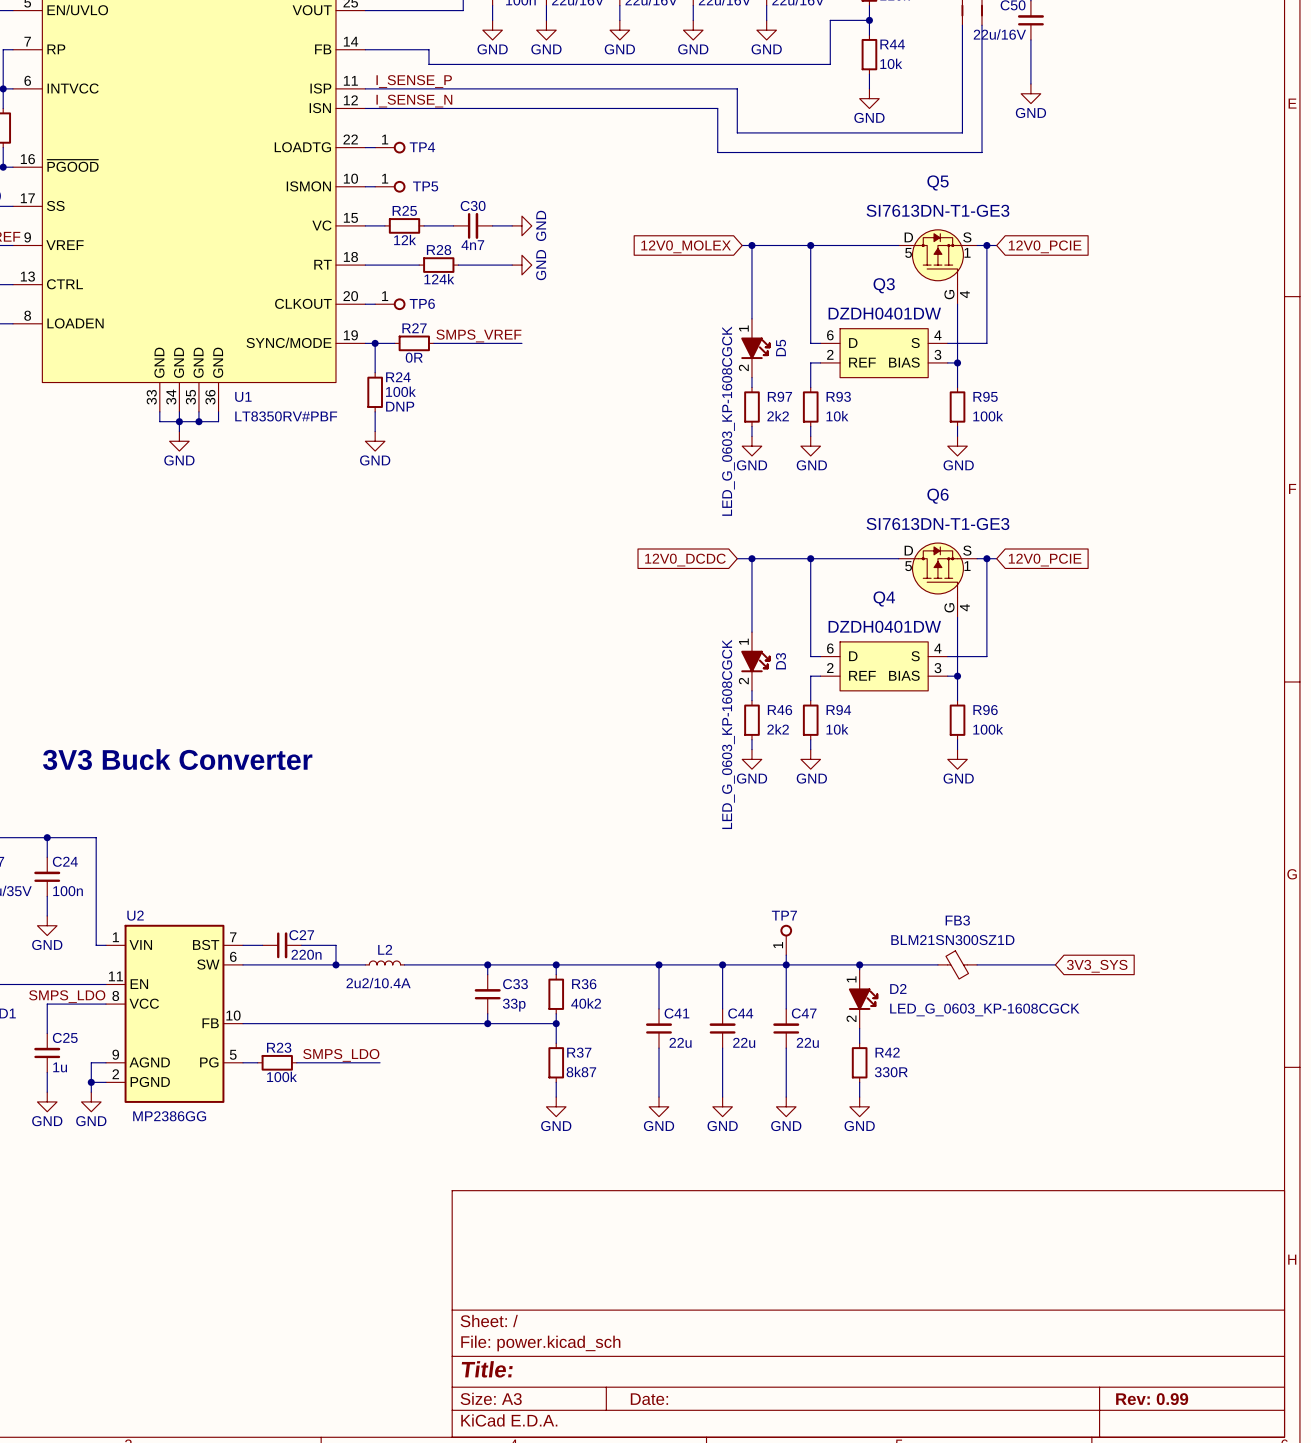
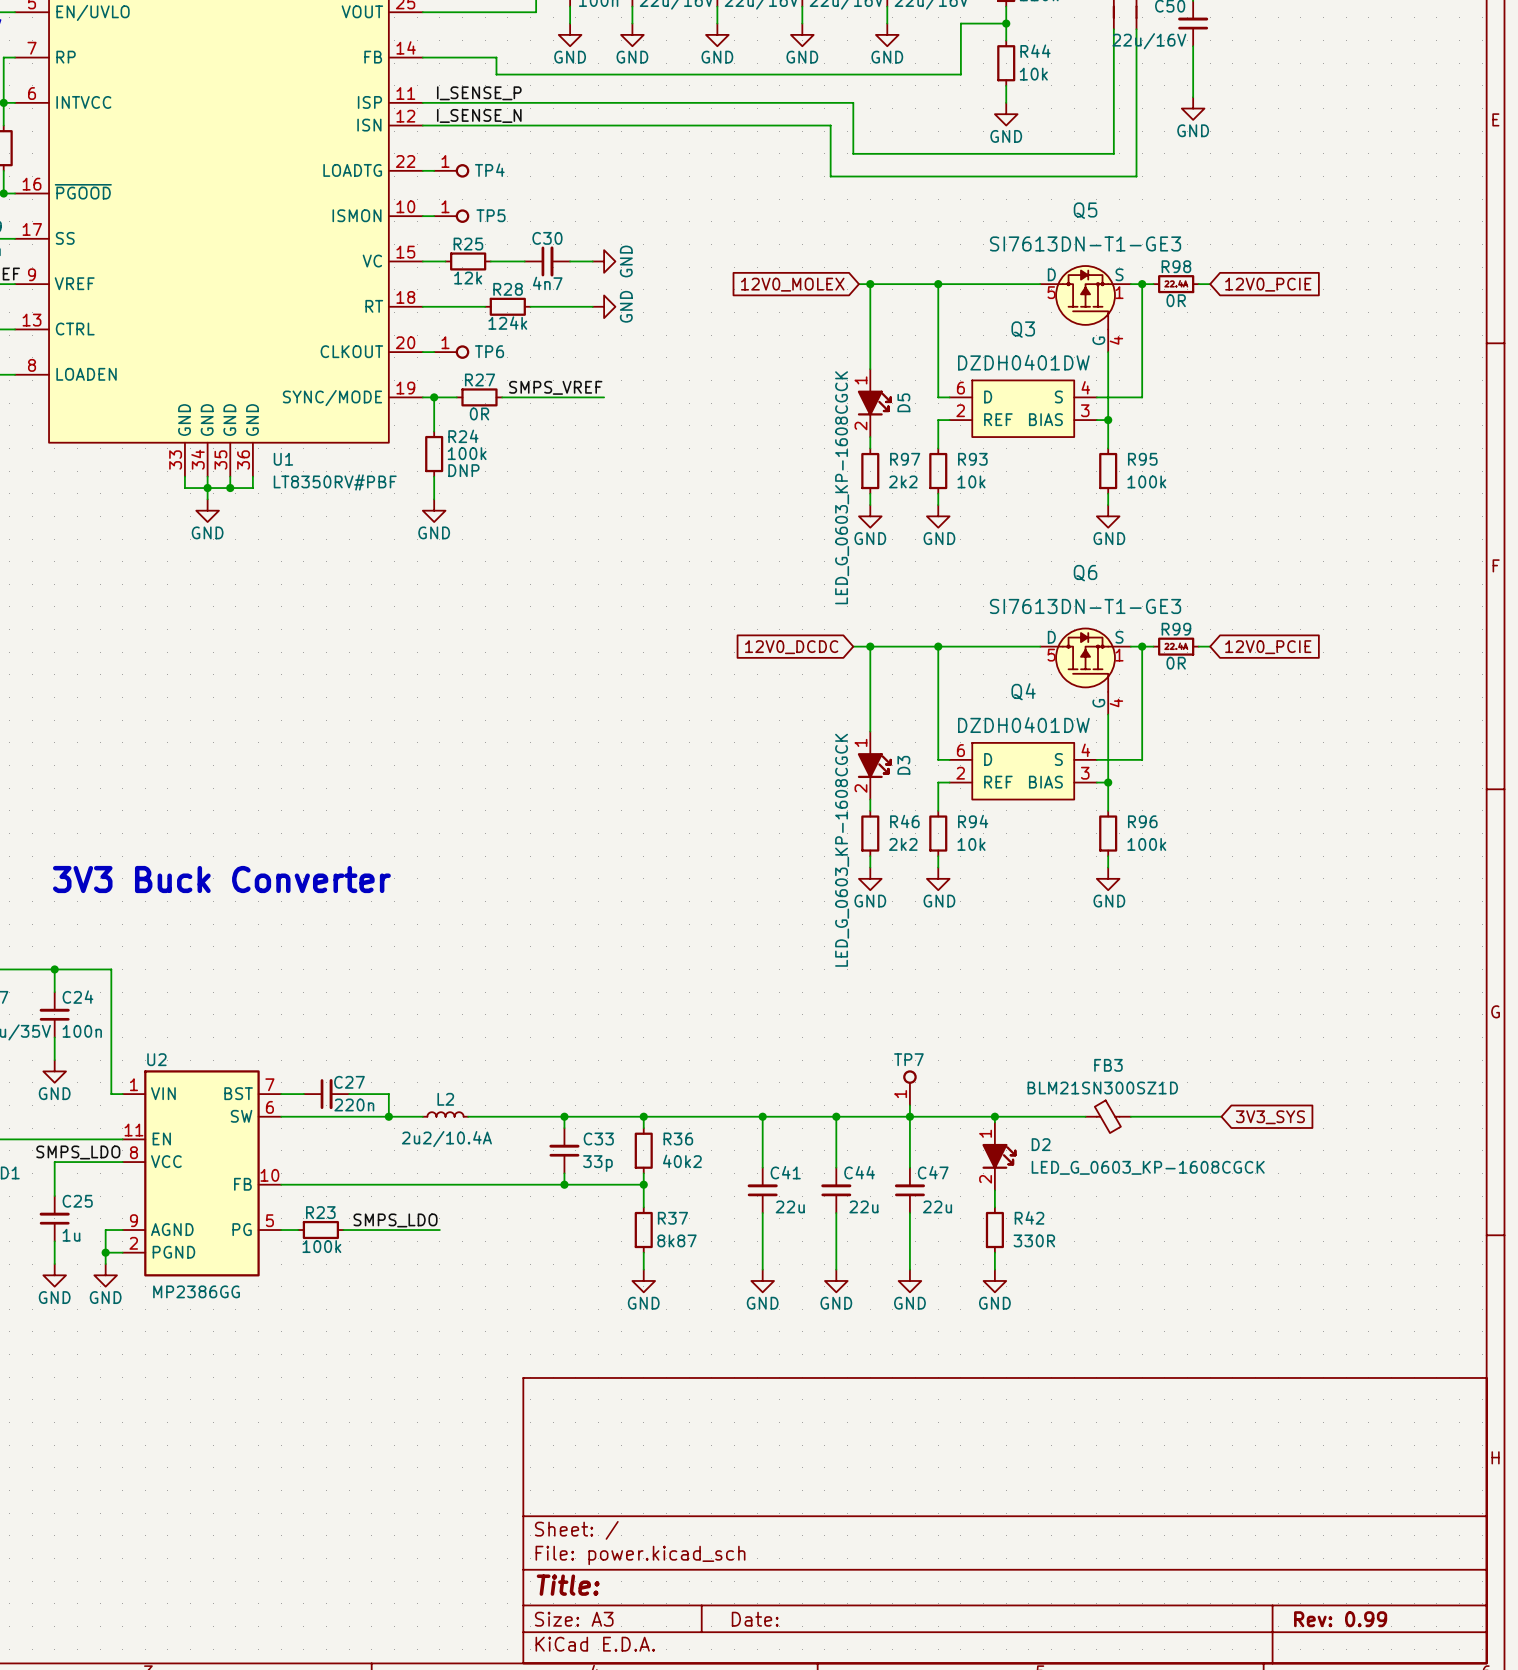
R98: none -> (1176, 284)
wire: none -> (1198, 284) (1210, 284)
global label position: 12V0_PCIE (1045, 246) -> 12V0_PCIE (1268, 284)
R99: none -> (1176, 646)
wire: none -> (1198, 646) (1210, 646)
global label position: 12V0_PCIE (1045, 560) -> 12V0_PCIE (1268, 647)

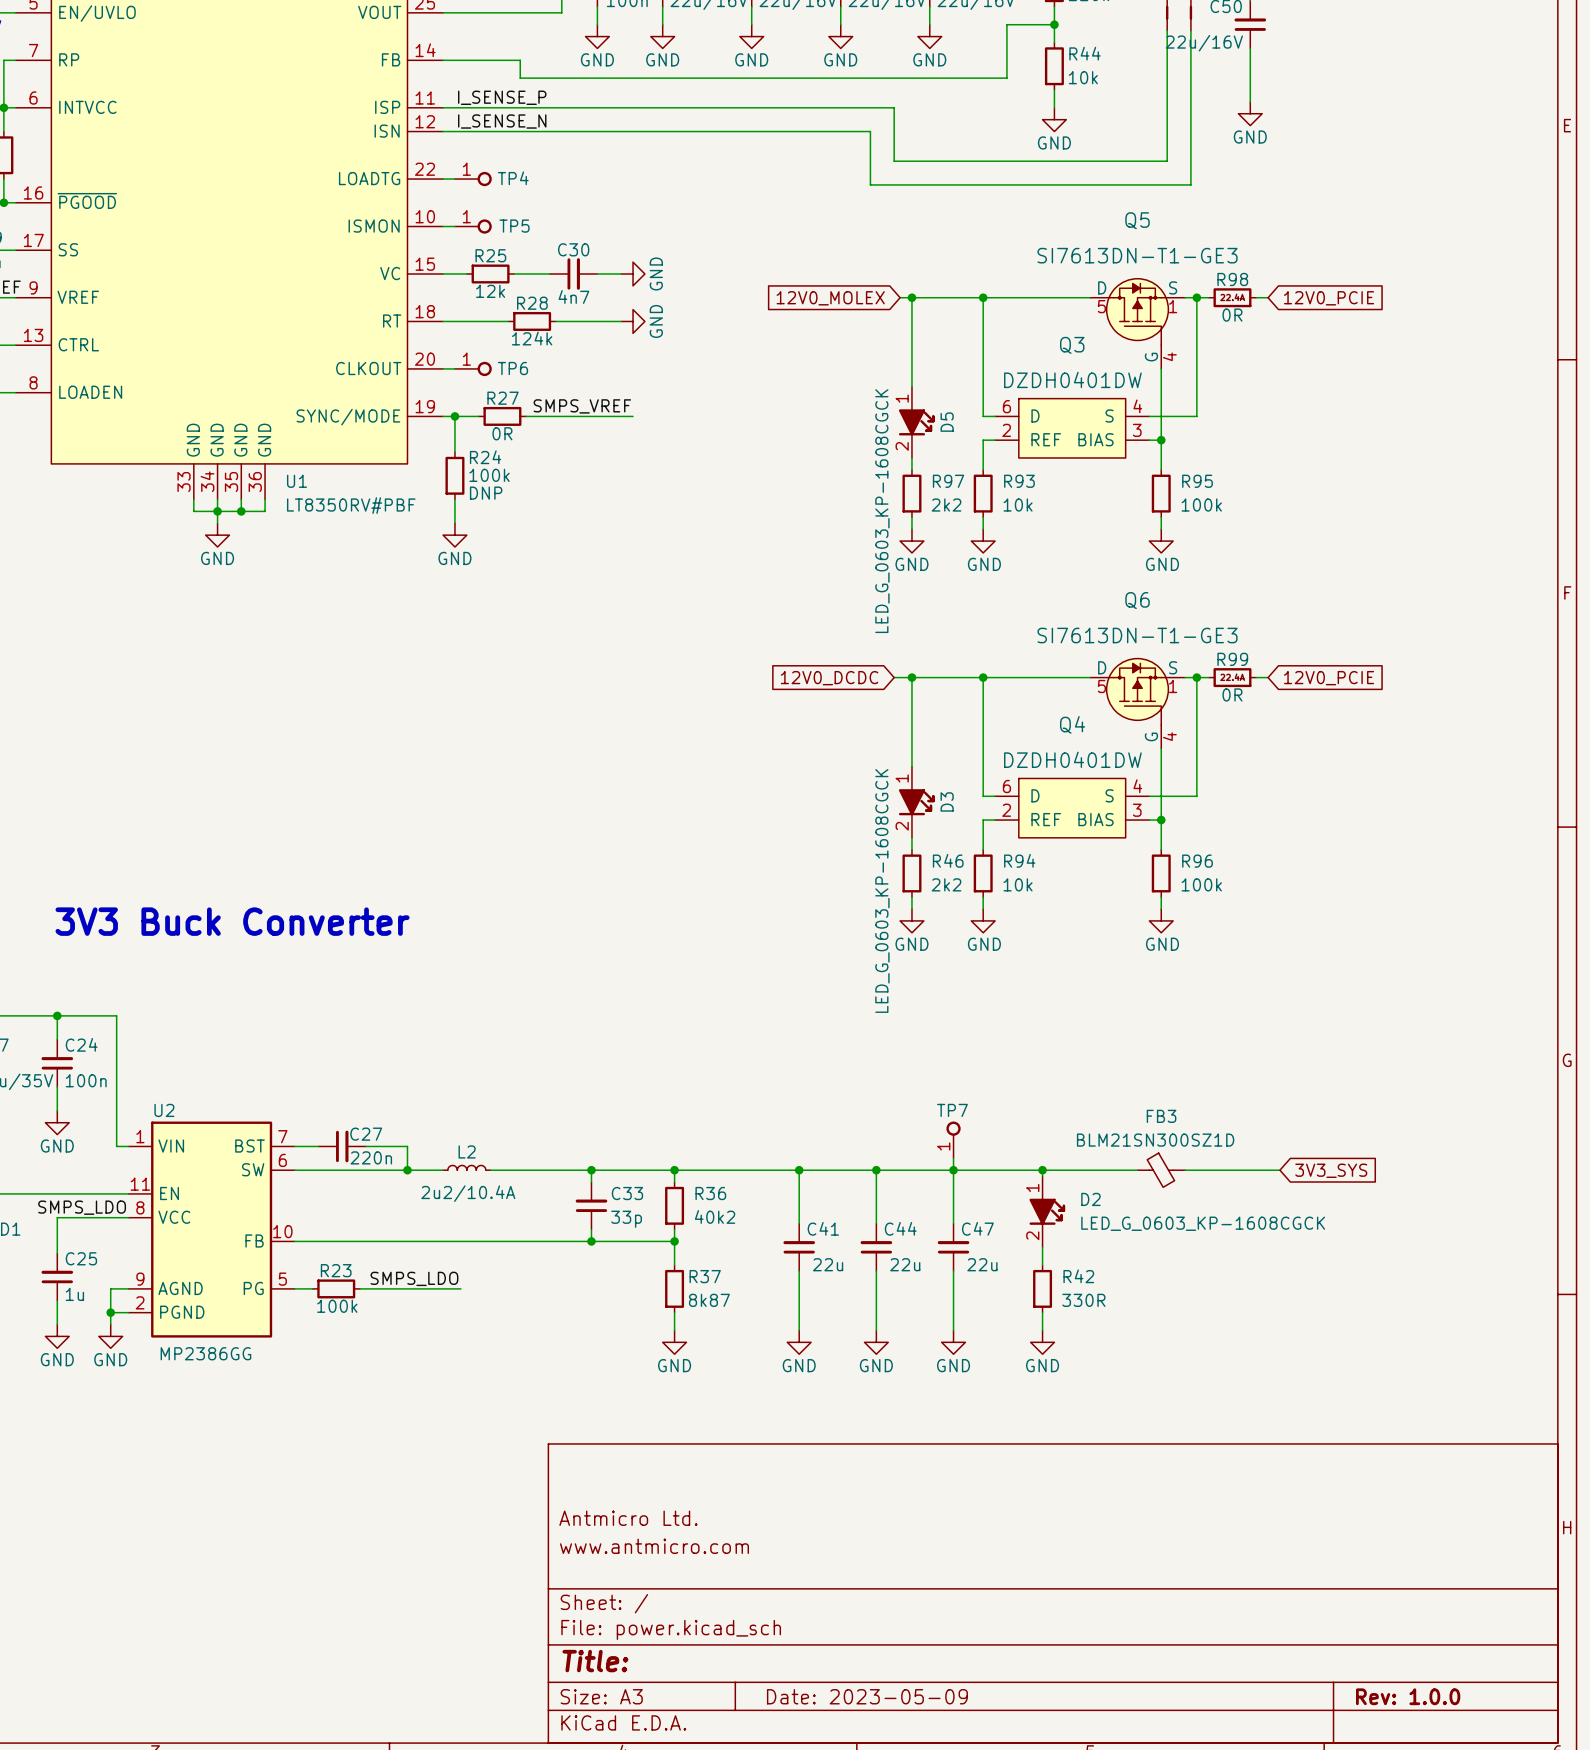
title block: none -> Antmicro Ltd. (628, 1518)
title block: none -> www.antmicro.com (654, 1546)
title block: Date: (755, 1619) -> Date: 2023-05-09 (867, 1696)
title block: Rev: 0.99 (1340, 1619) -> Rev: 1.0.0 (1408, 1696)

